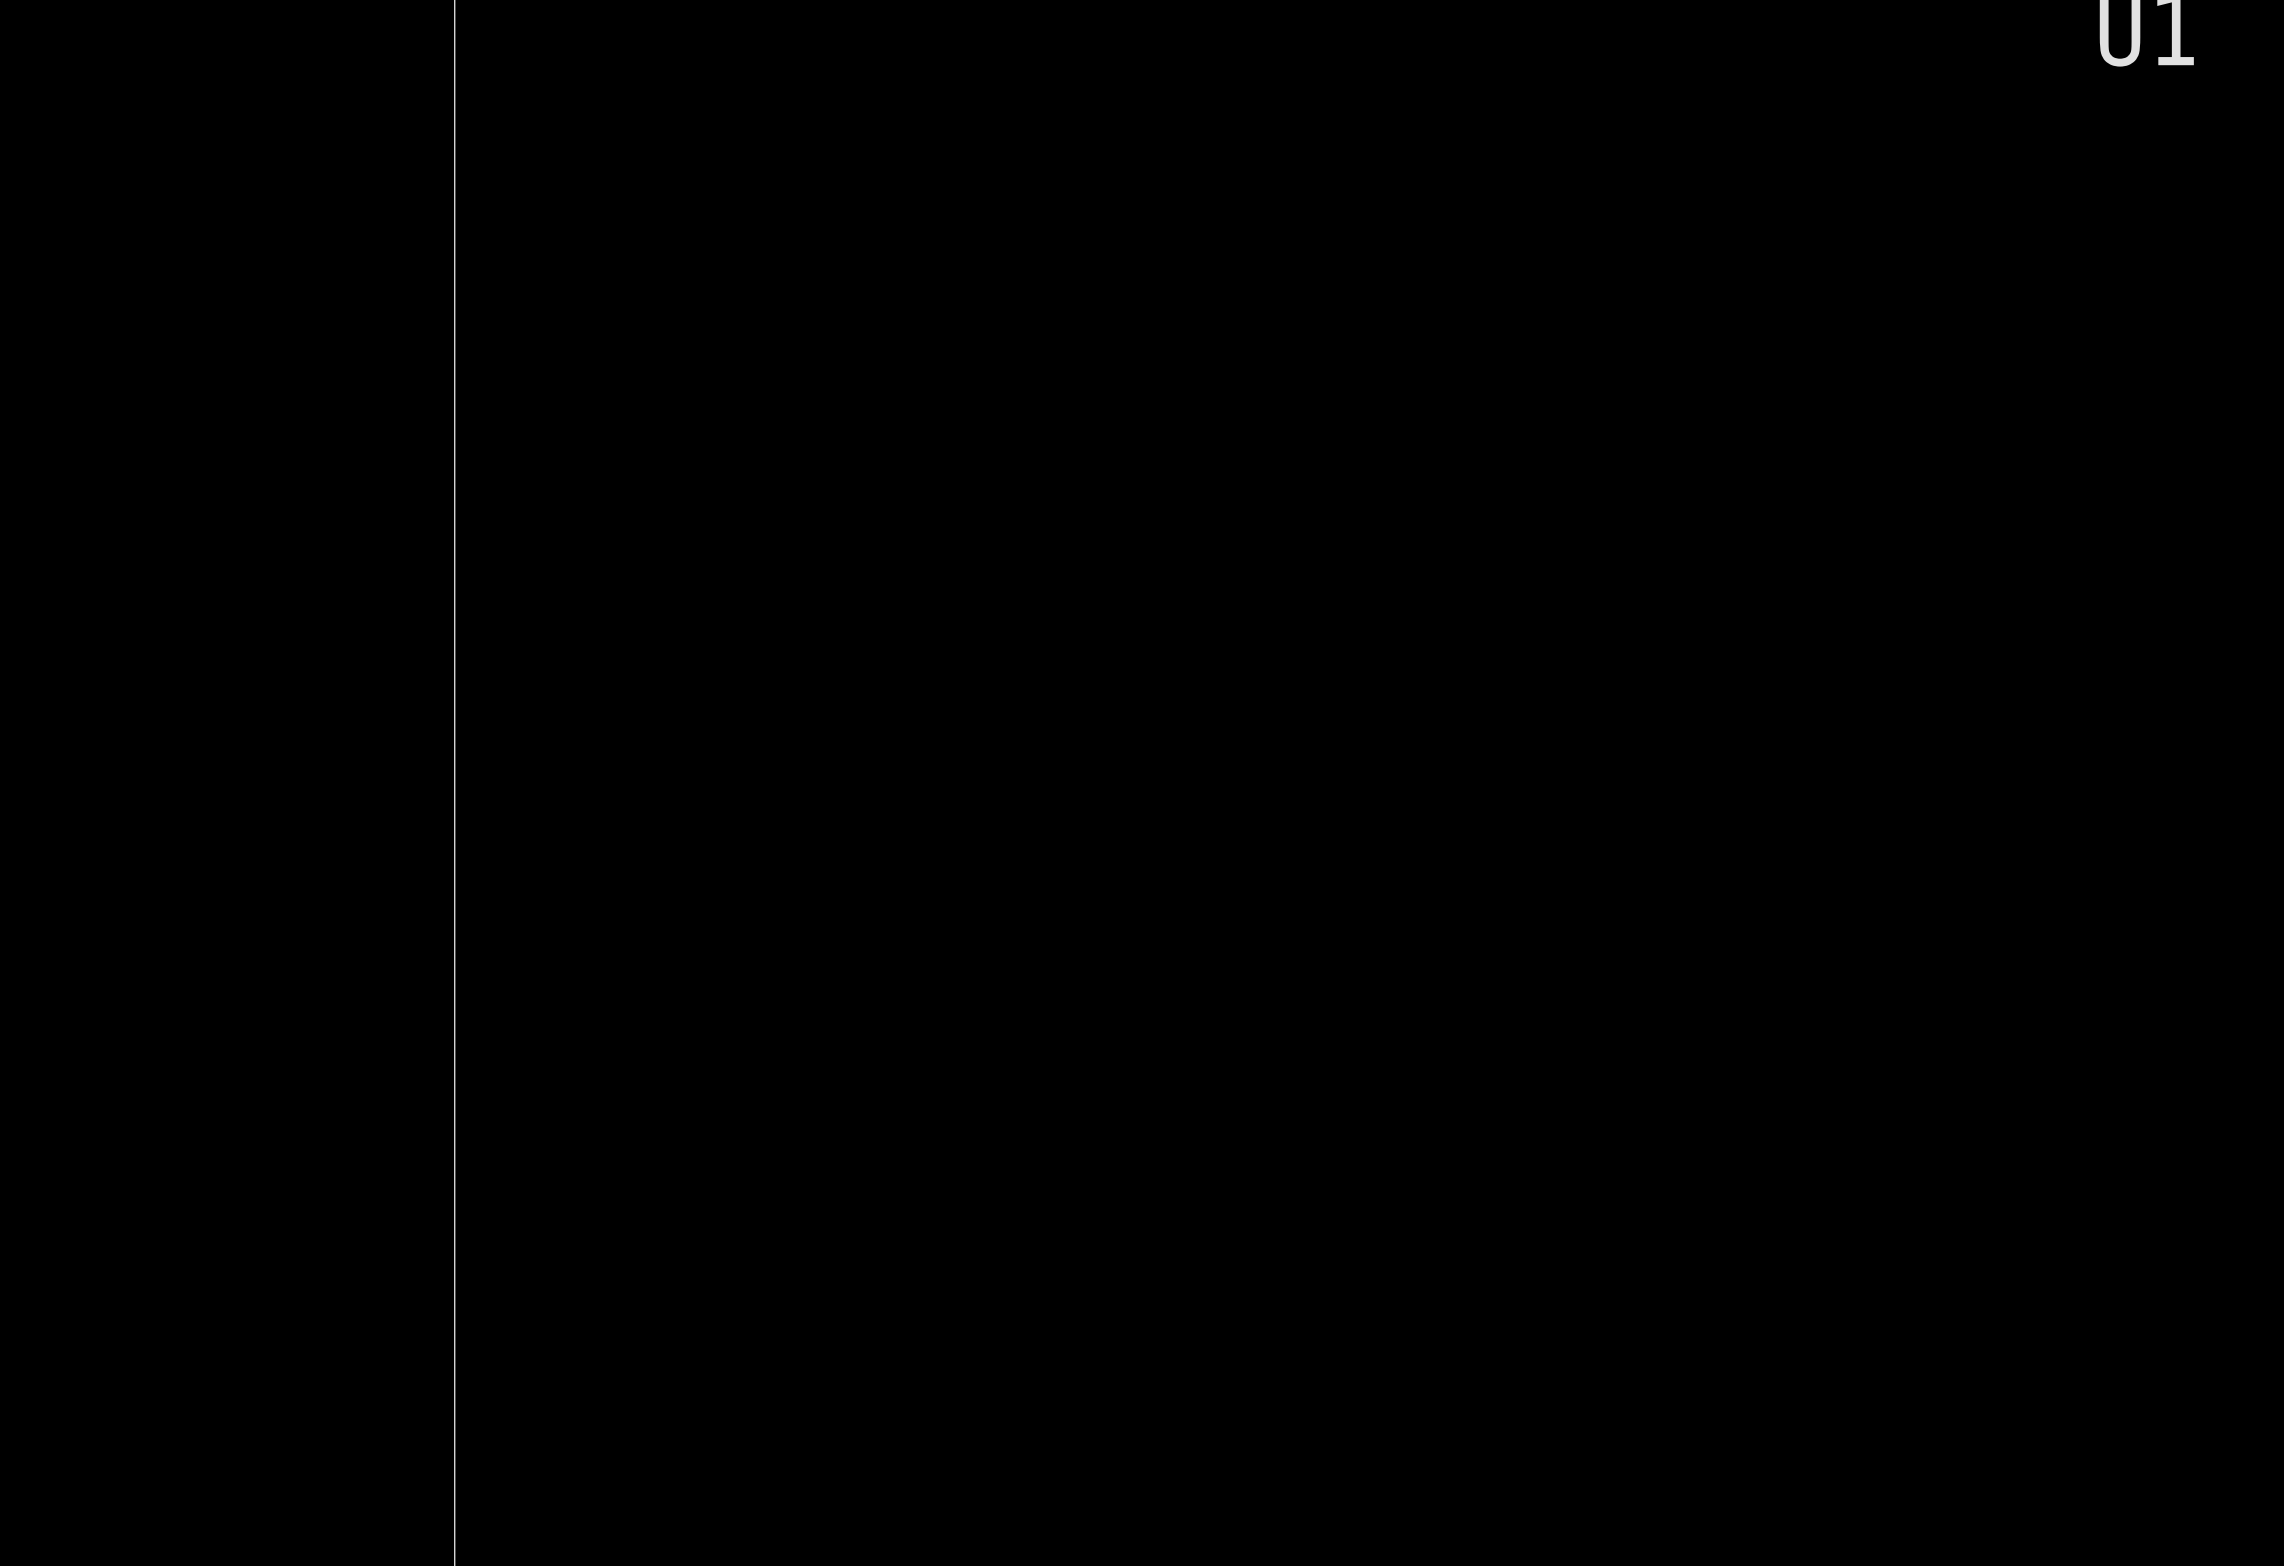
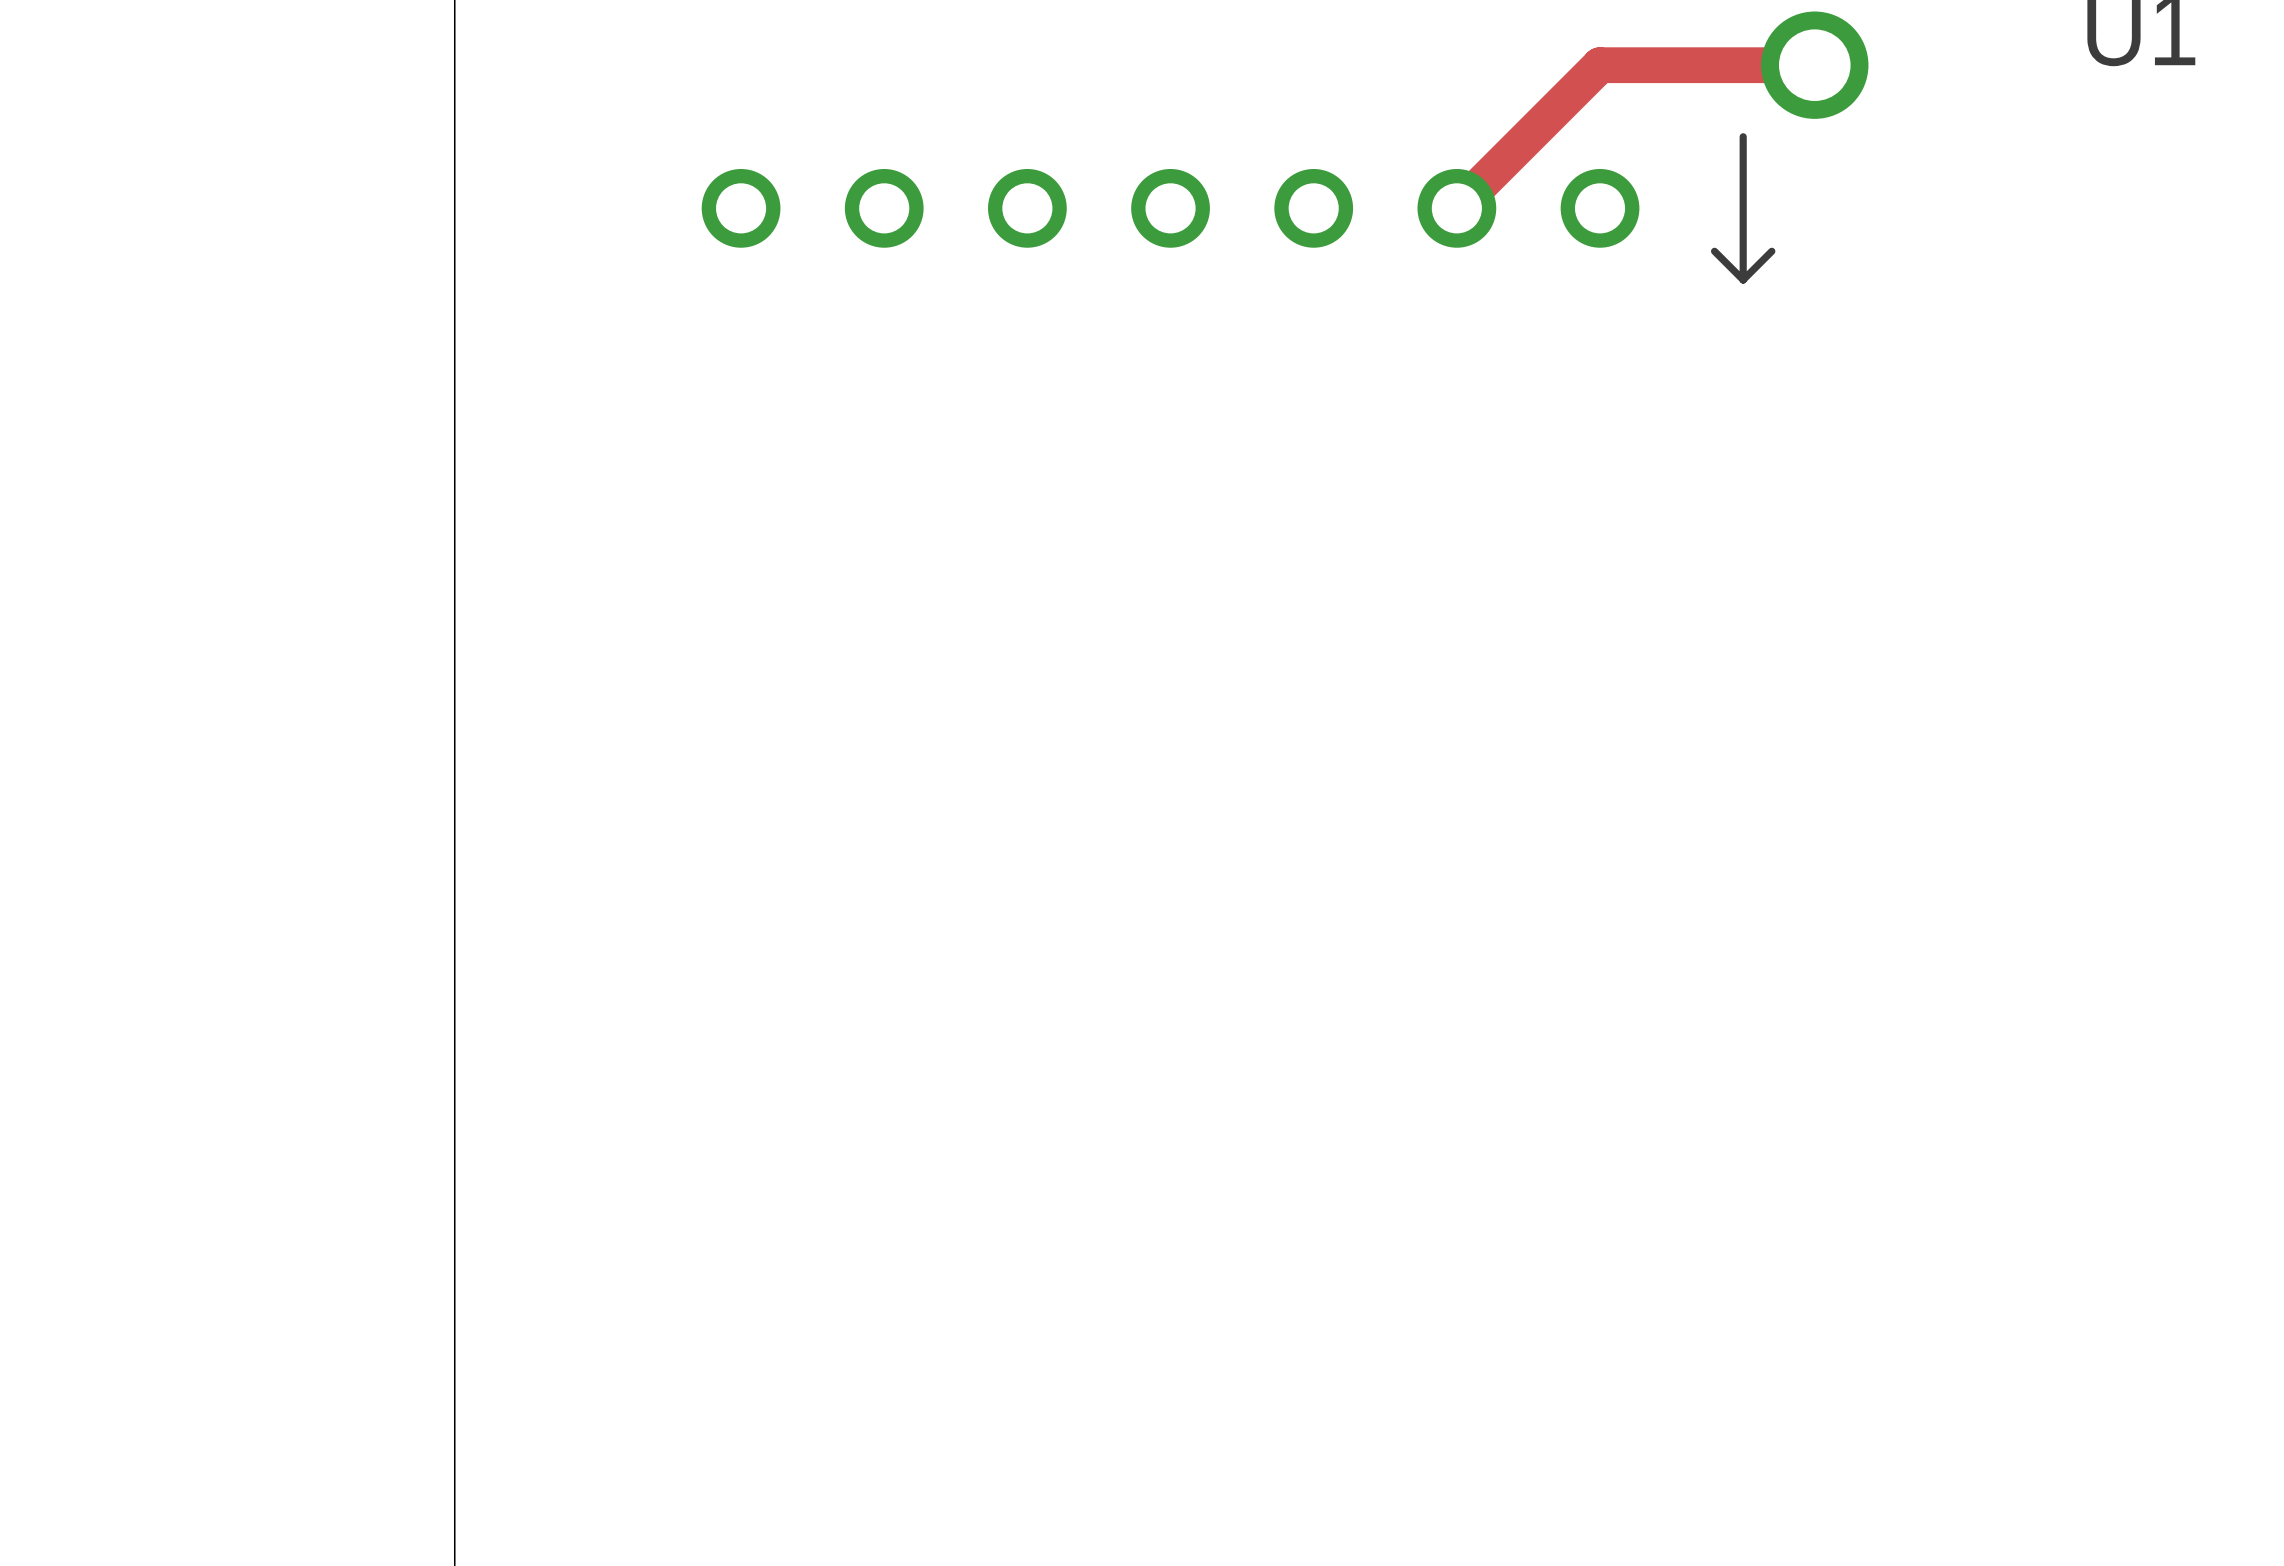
top track: none -> (1814, 65) (1600, 65) (1456, 208)
via: none -> (1814, 65)
part: none -> (1238, 208)

